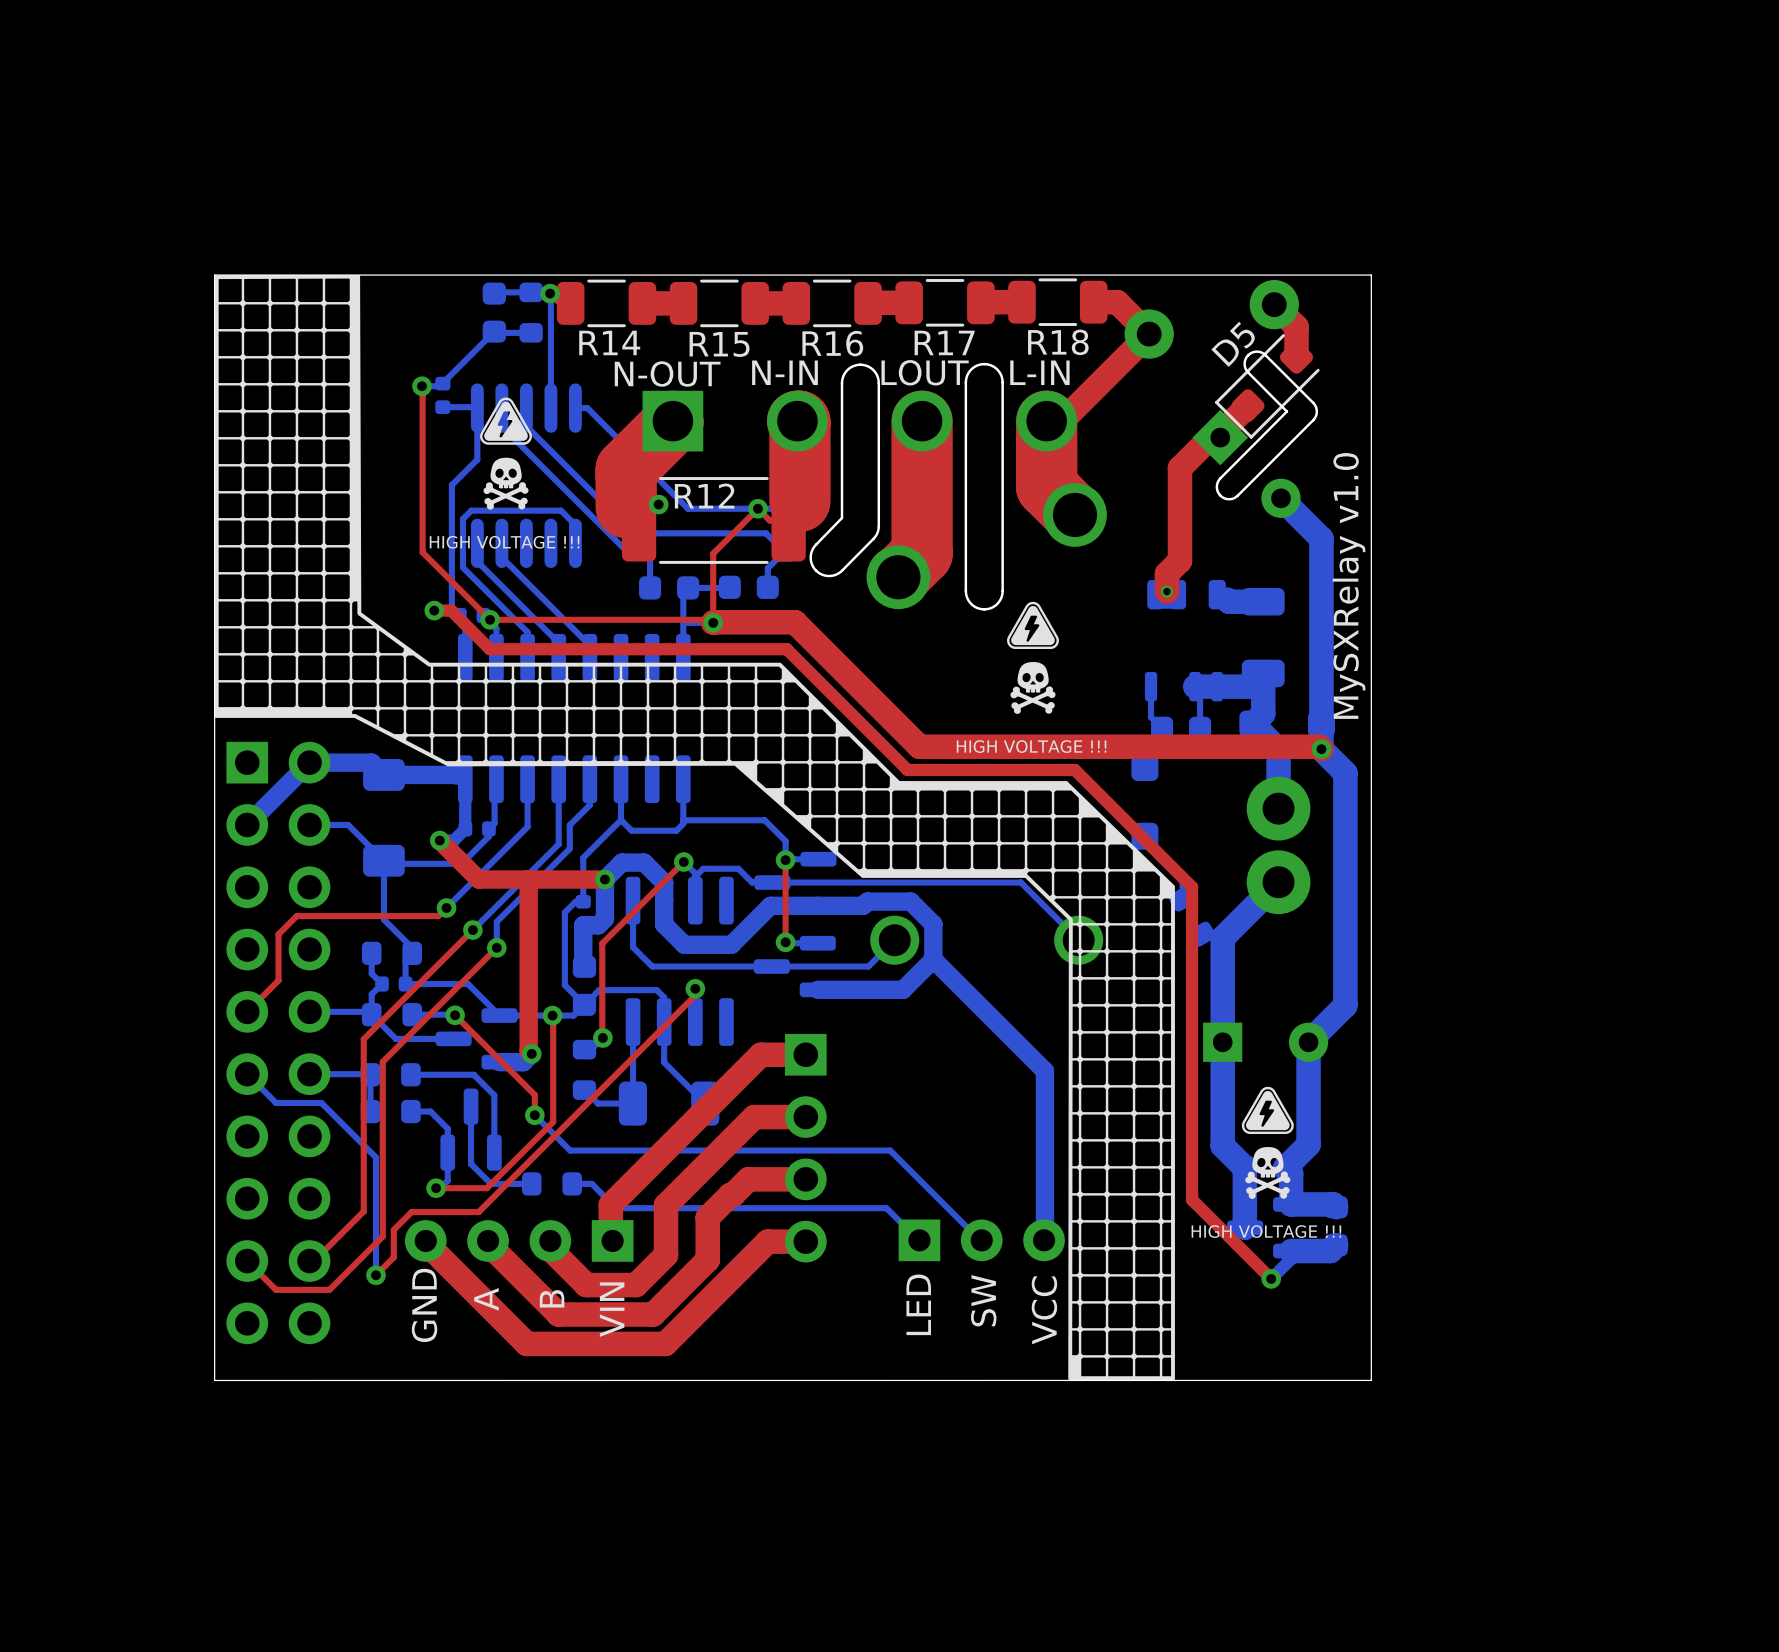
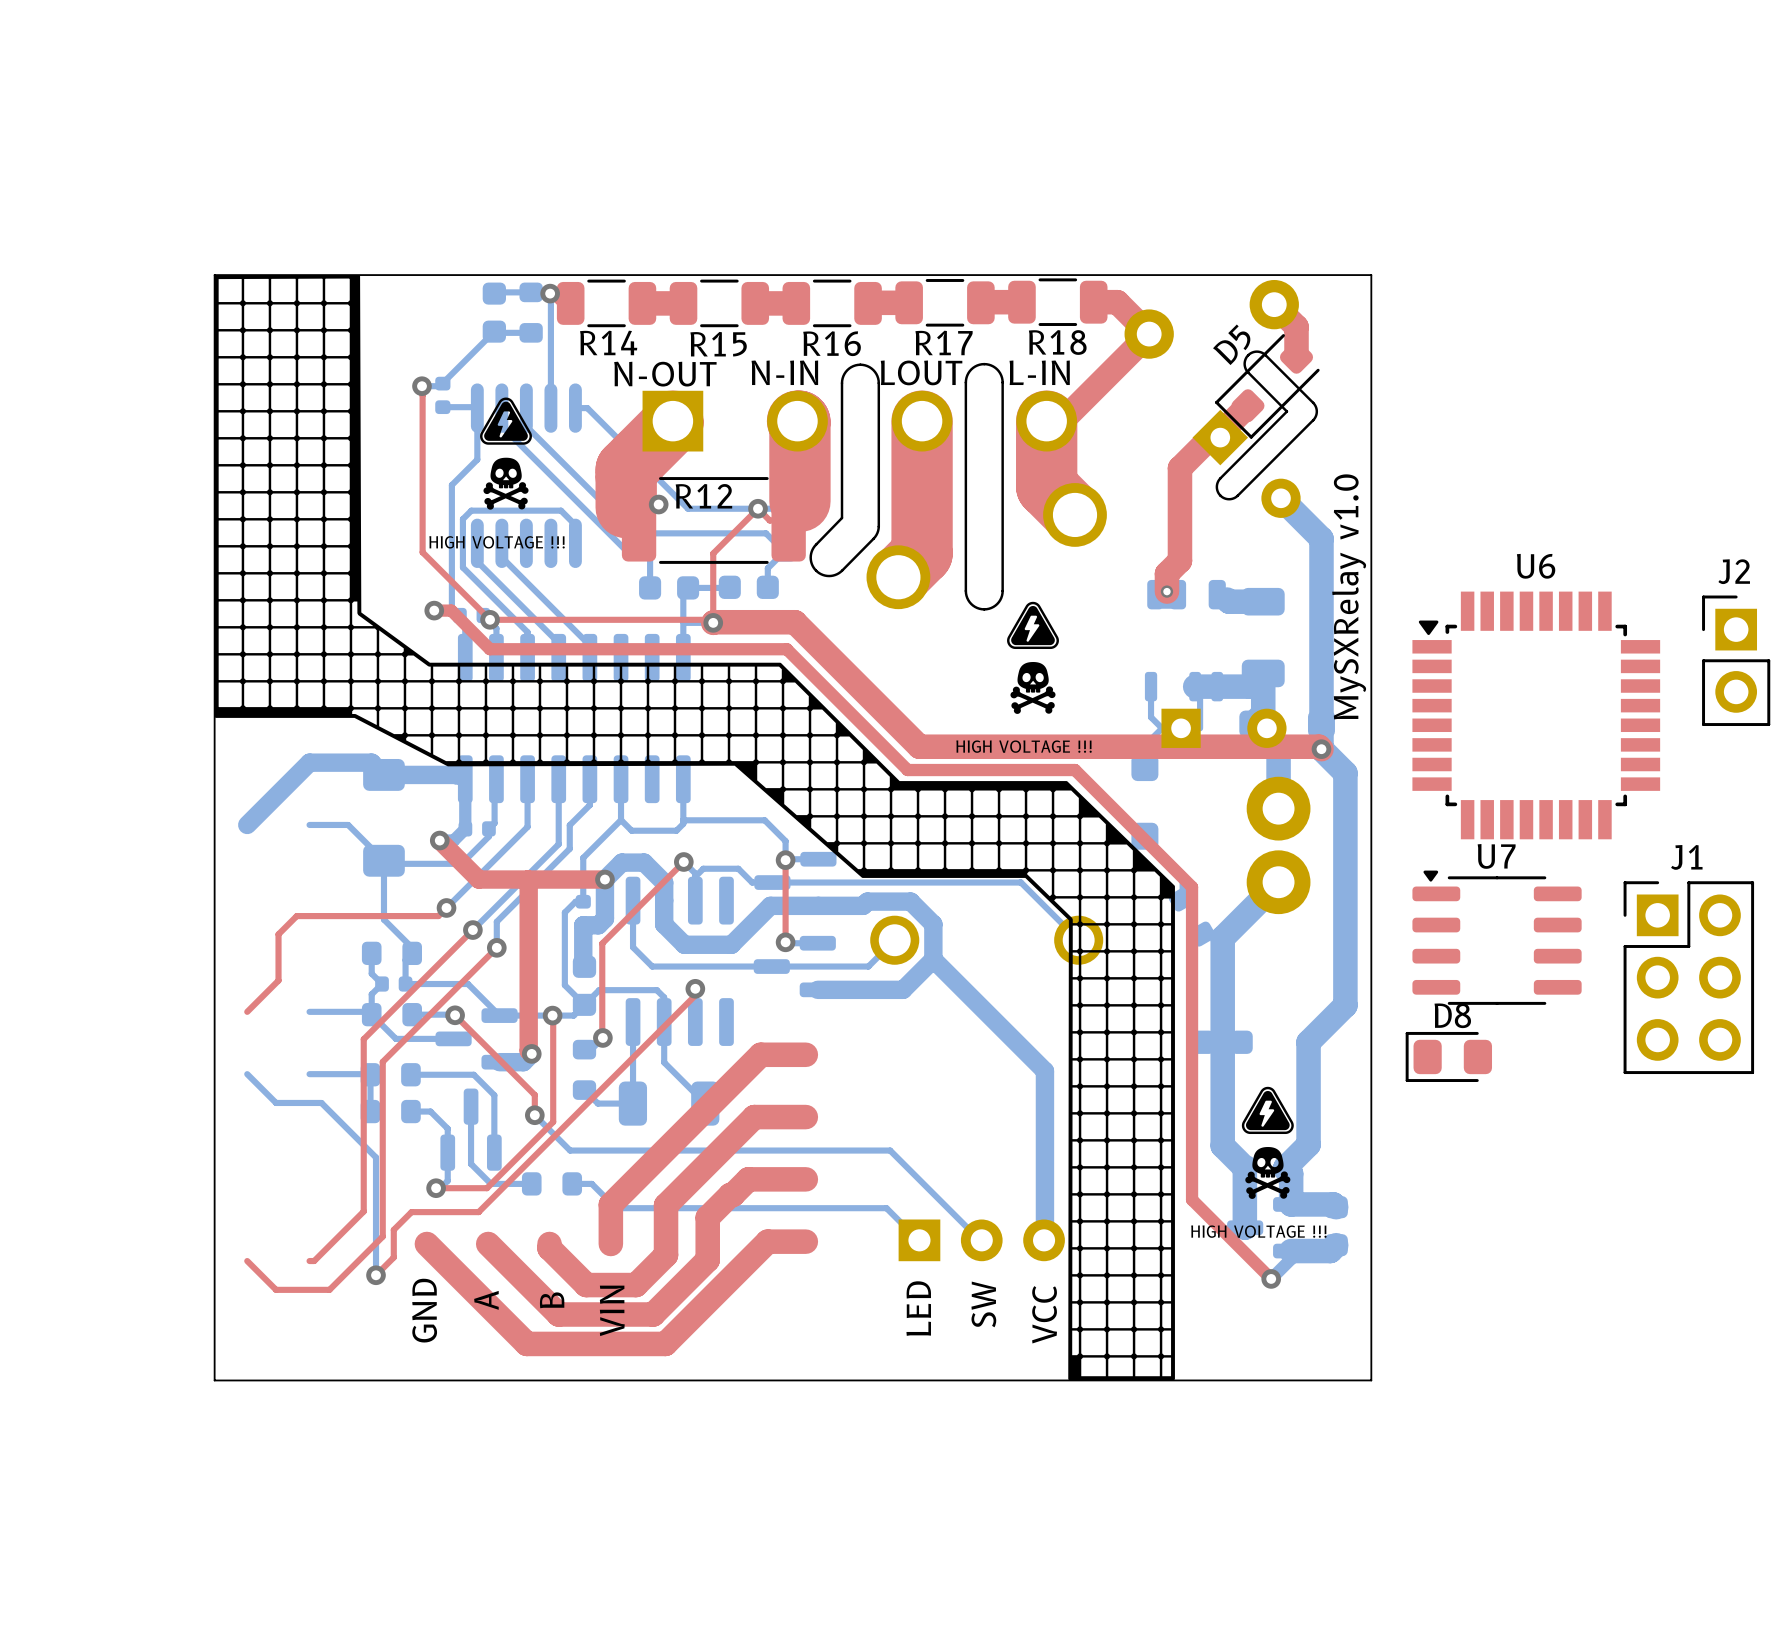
J2: none -> (1736, 660)
U6: none -> (1536, 715)
part position: (1181, 728) -> (1222, 1042)
U7: none -> (1497, 937)
J1: none -> (1688, 977)
part position: (1265, 1042) -> (1224, 728)
part: (278, 1043) -> none
D8: none -> (1448, 1056)
part: (805, 1148) -> none
part: (519, 1240) -> none

